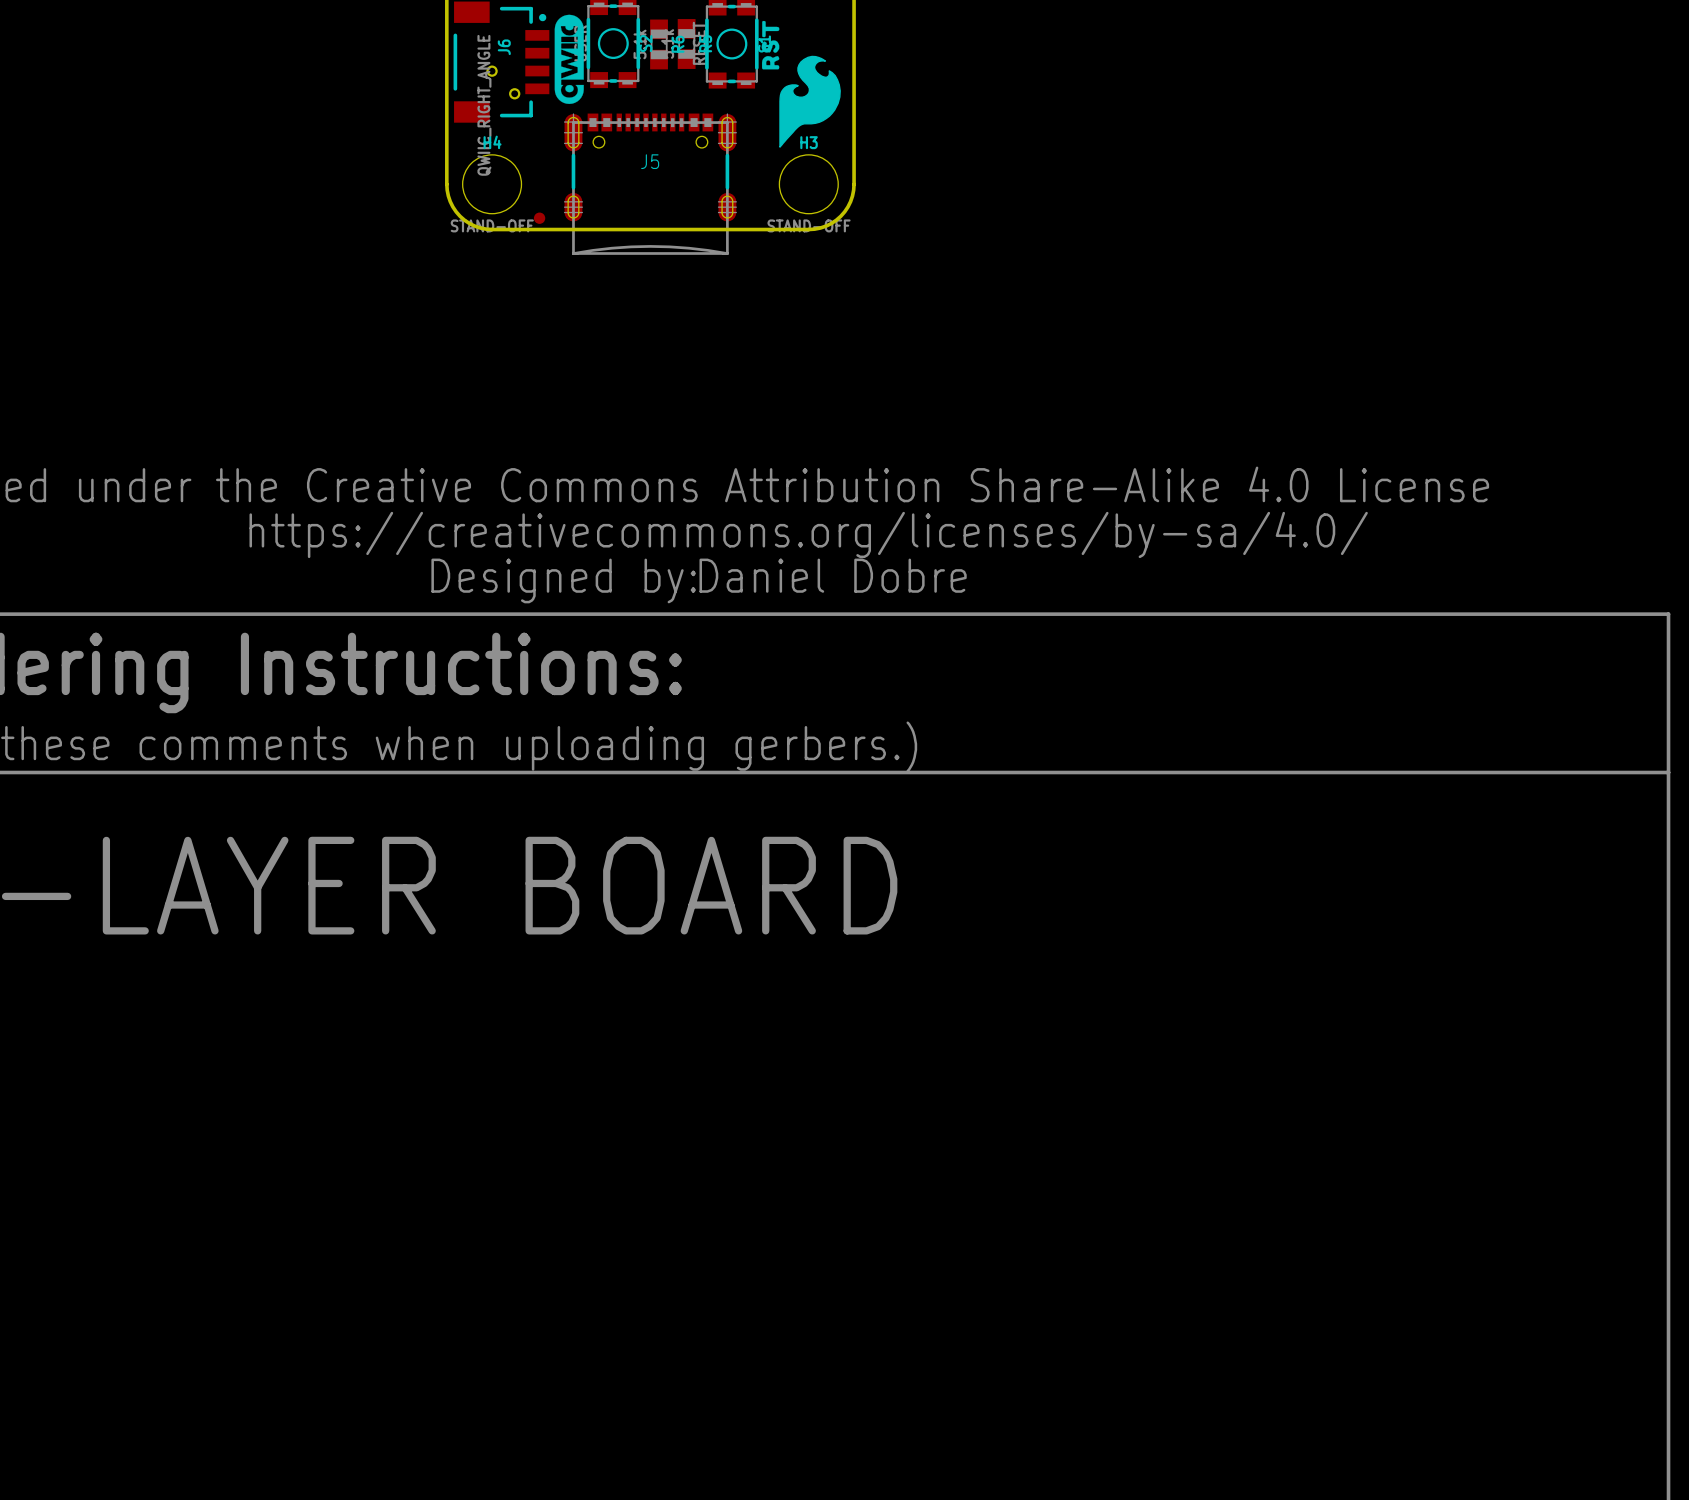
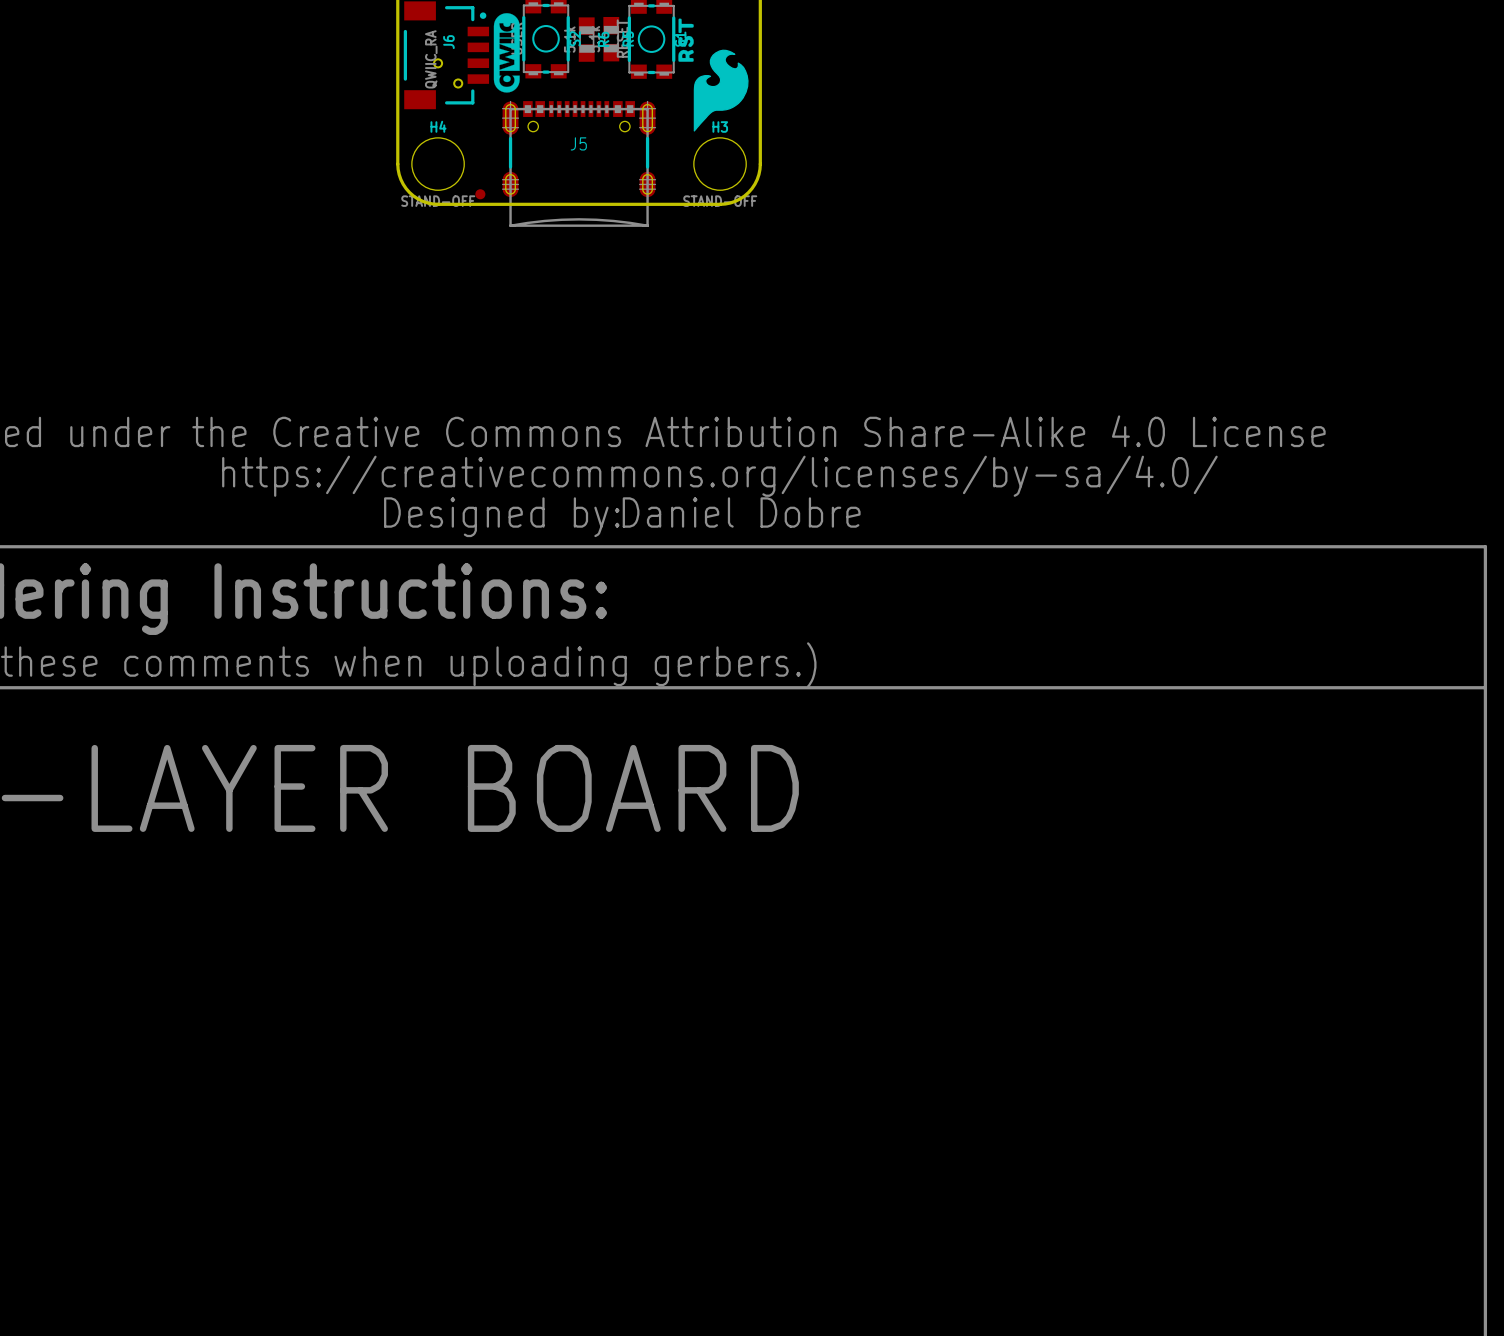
J6 value: QWIIC_RIGHT_ANGLE (484, 105) -> QWIIC_RA (431, 59)

